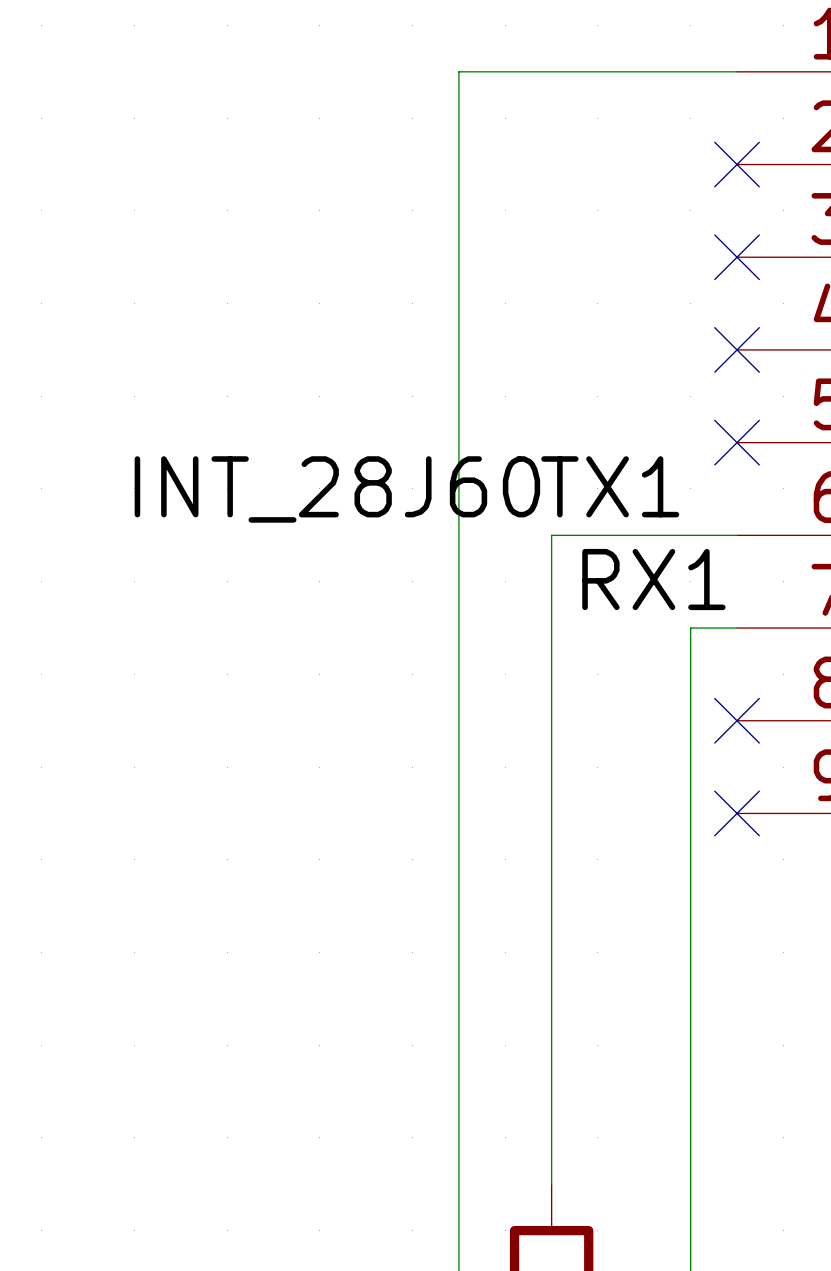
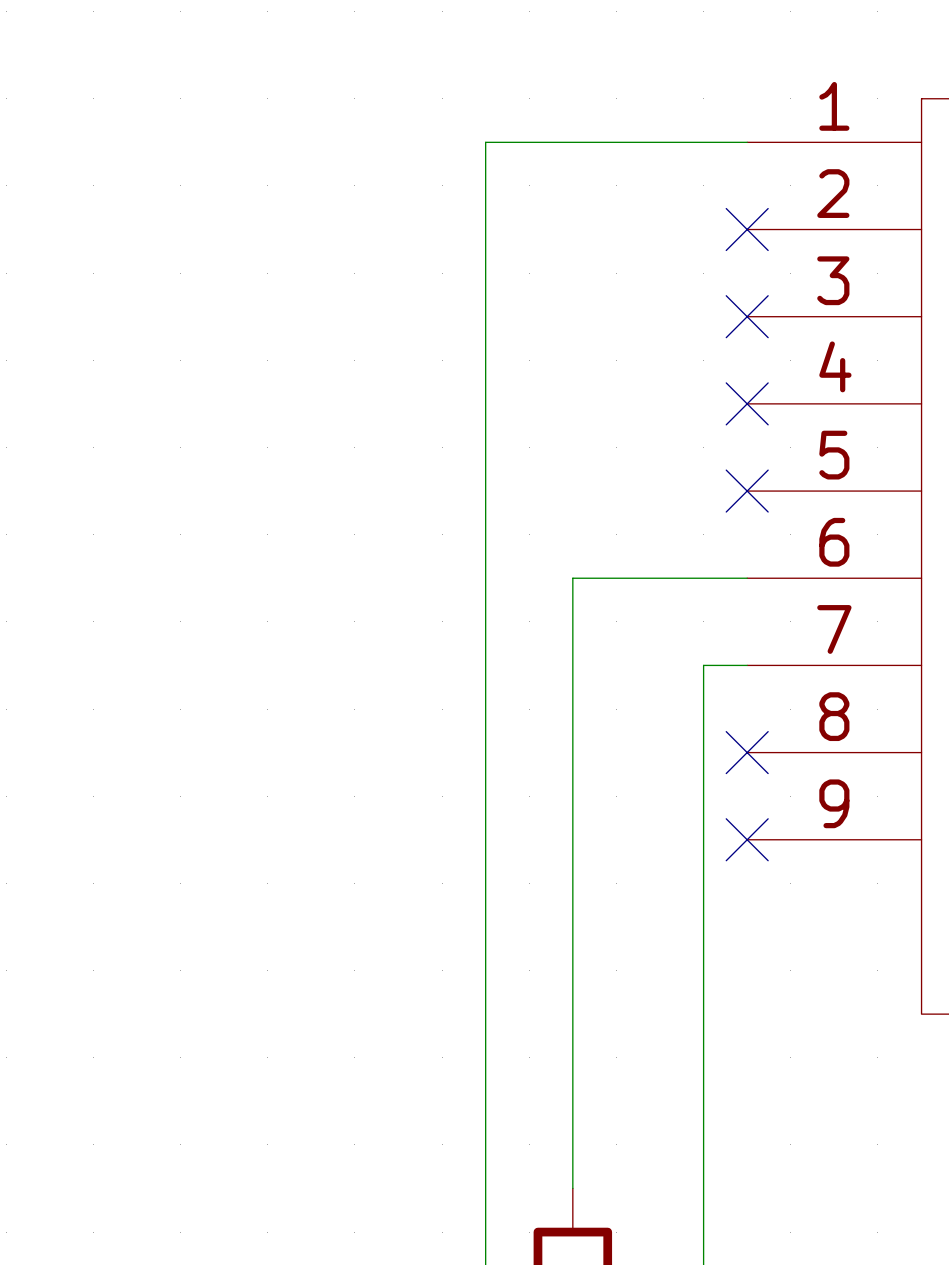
label: TX1 (610, 486) -> none
label: INT_28J60 (337, 489) -> none
label: RX1 (653, 579) -> none

